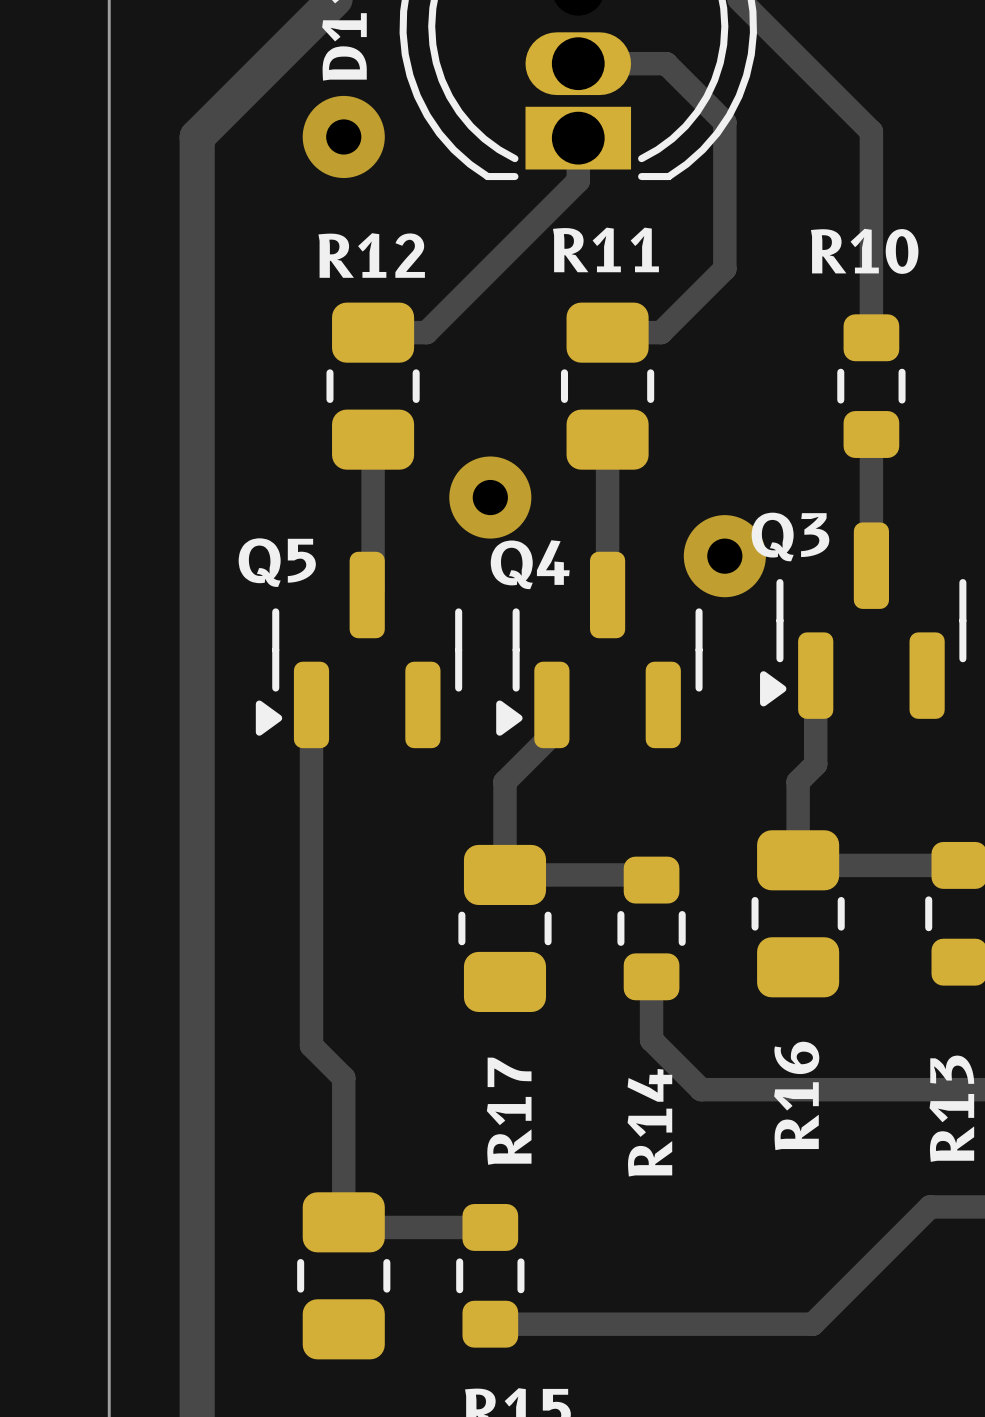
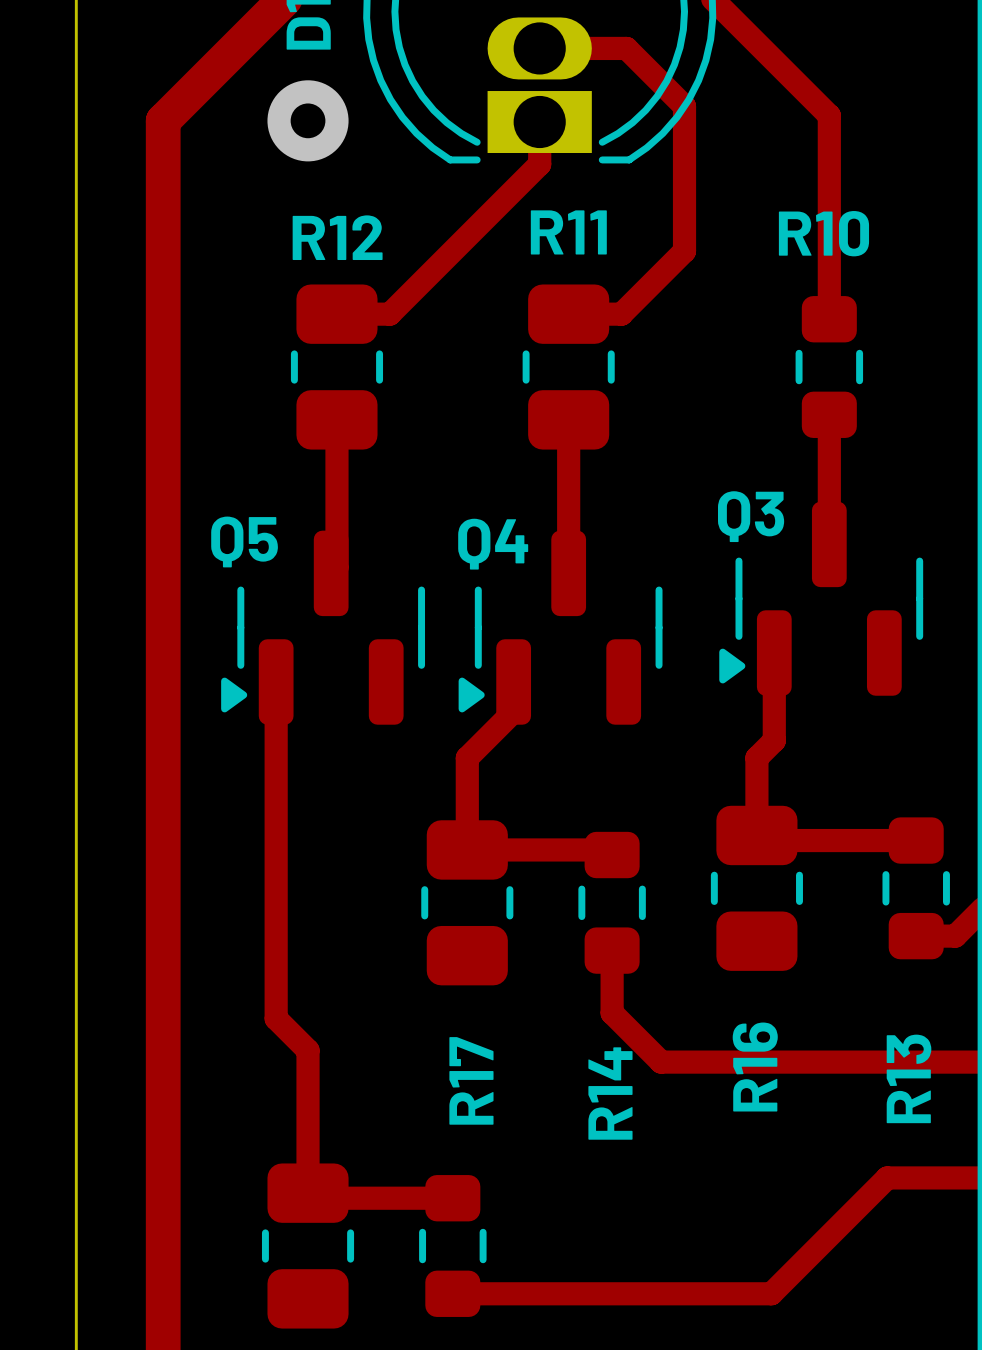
via: (490, 497) -> none
via: (724, 556) -> none

